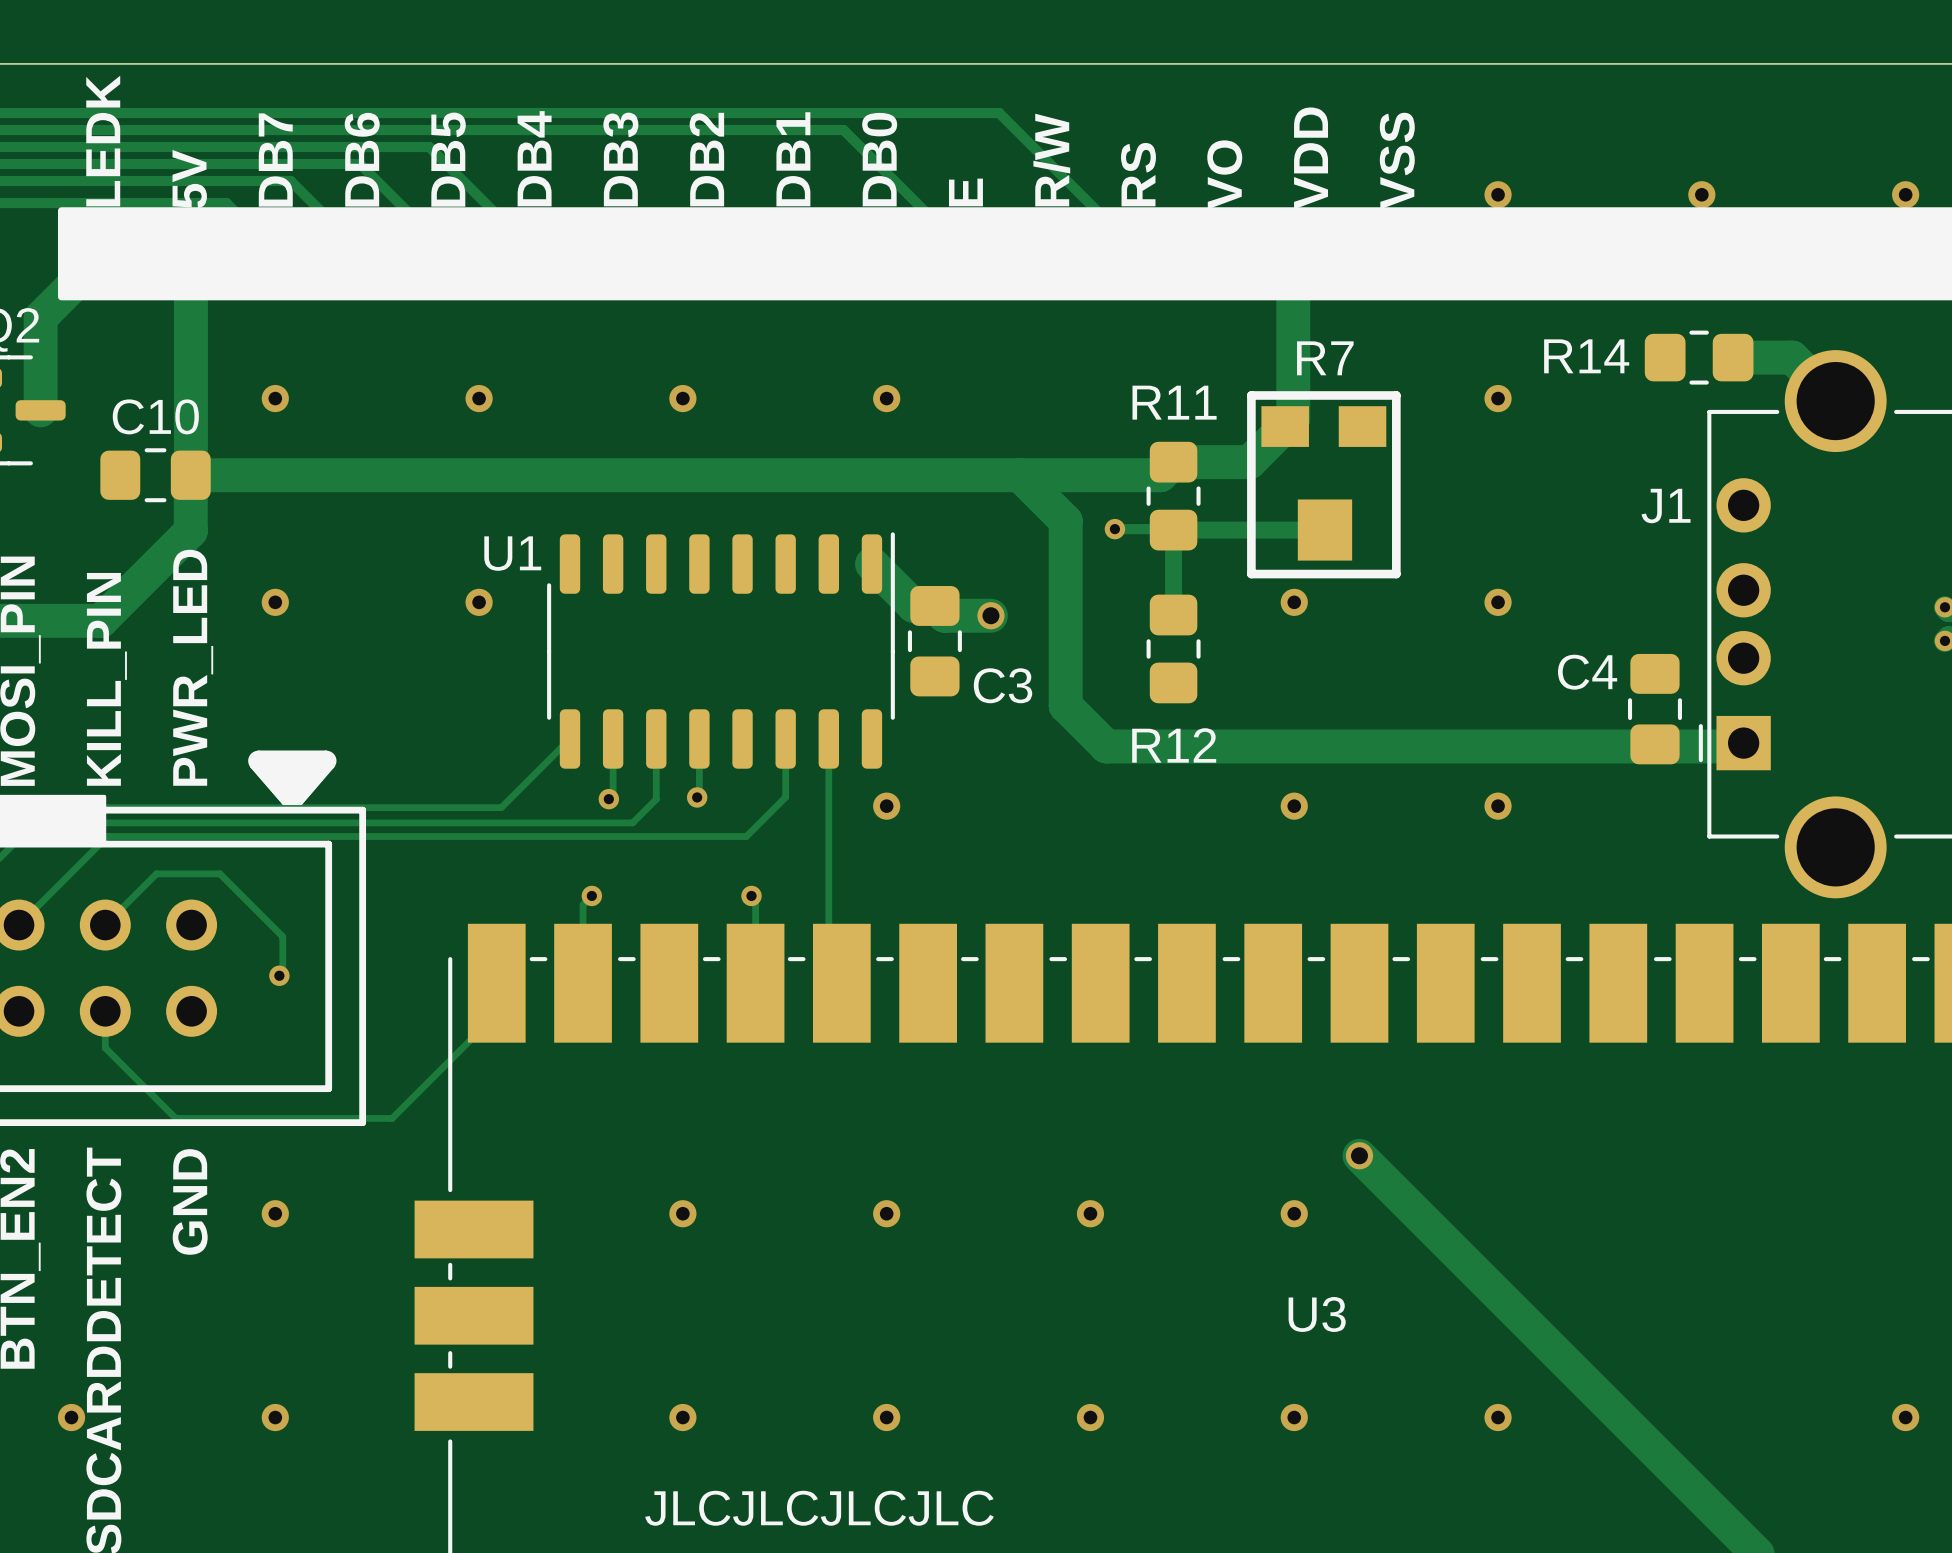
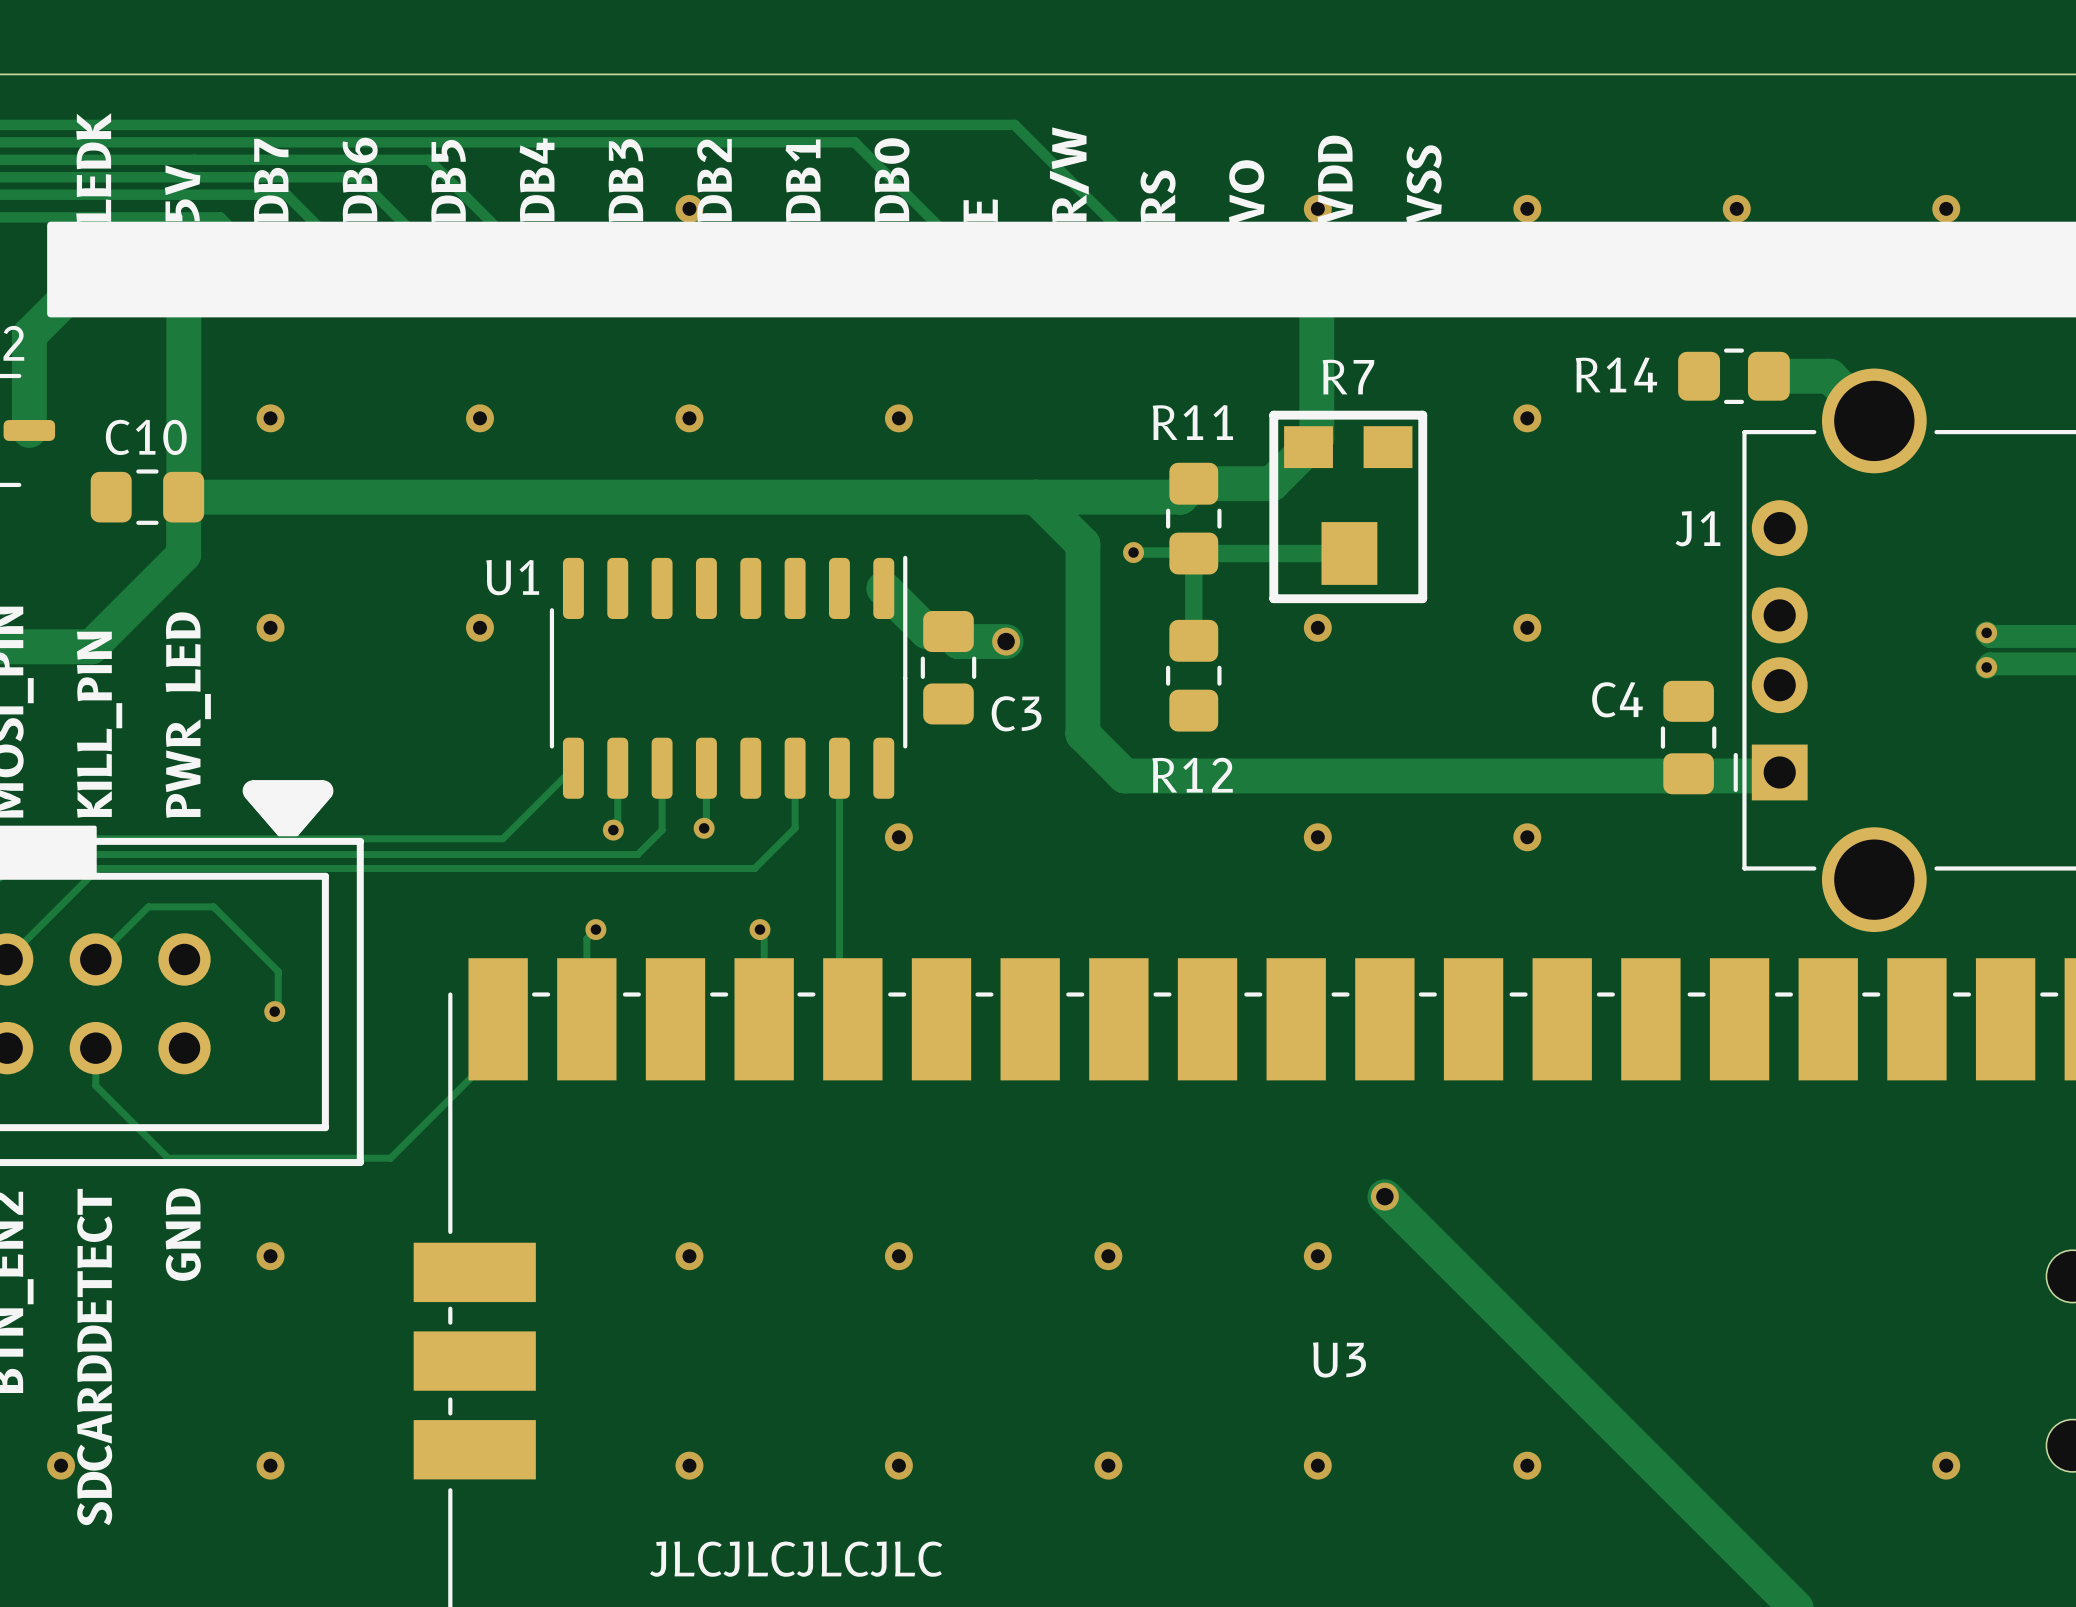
via: none -> (689, 208)
via: none -> (1317, 208)

